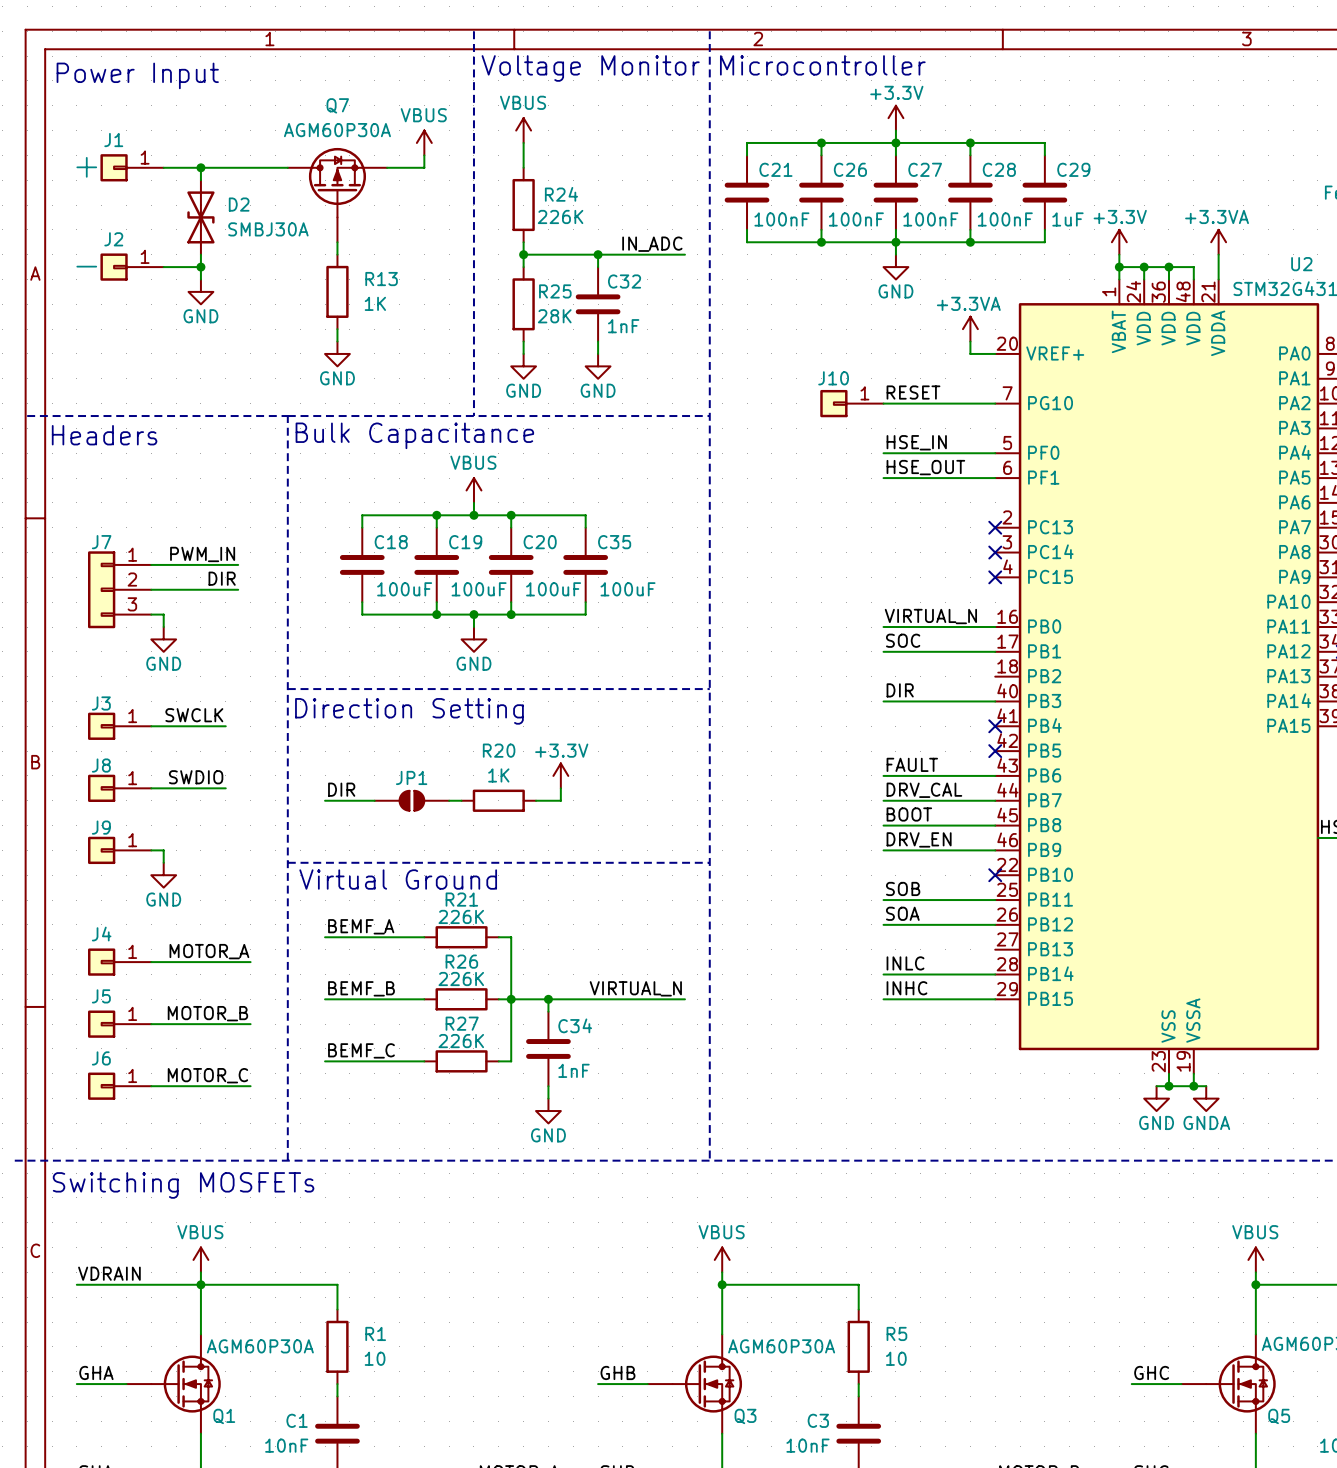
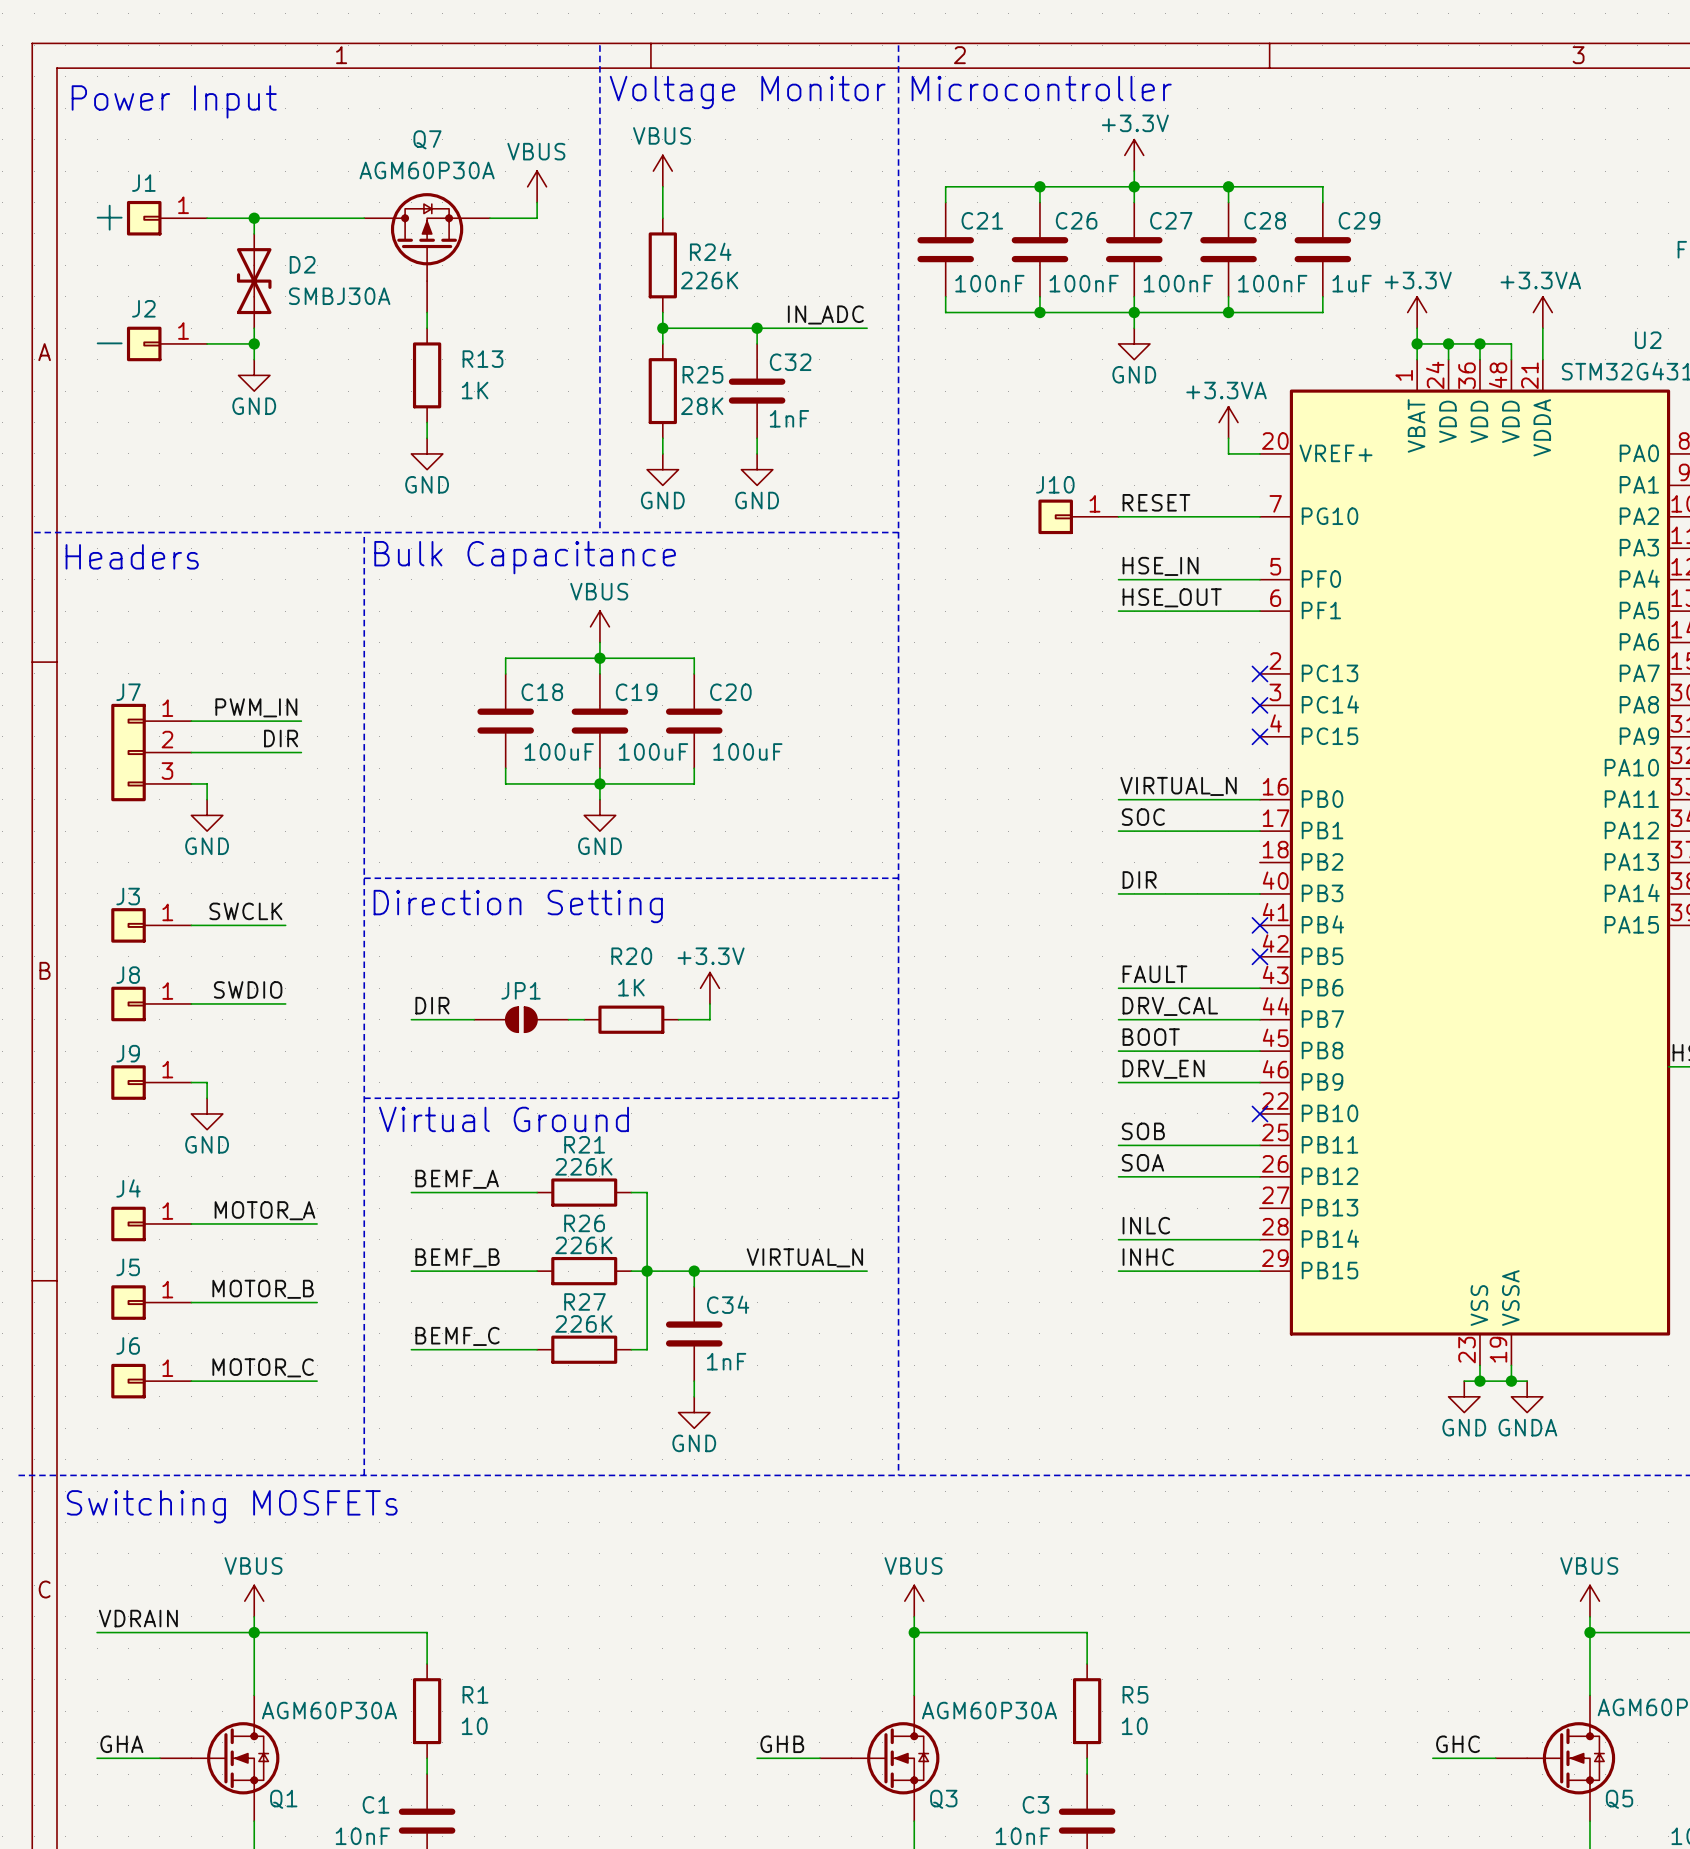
wire: (399, 515) (362, 515) (362, 527) -> (505, 658) (505, 673)
wire: (436, 515) (436, 527) -> none
junction: (436, 515) -> none
wire: (511, 515) (511, 527) -> (599, 658) (599, 673)
junction: (511, 515) -> none
wire: (548, 515) (585, 515) (585, 527) -> (694, 658) (694, 673)
C18 position: (362, 564) -> (505, 721)
C19 position: (436, 564) -> (599, 721)
C20 position: (511, 564) -> (694, 721)
C35: 100uF (585, 564) -> none
wire: (362, 602) (362, 614) (399, 614) -> (505, 768) (505, 783)
wire: (436, 602) (436, 614) -> none
wire: (511, 602) (511, 614) -> (599, 768) (599, 783)
wire: (585, 602) (585, 614) (548, 614) -> (694, 768) (694, 783)
junction: (436, 614) -> none
junction: (511, 614) -> none

